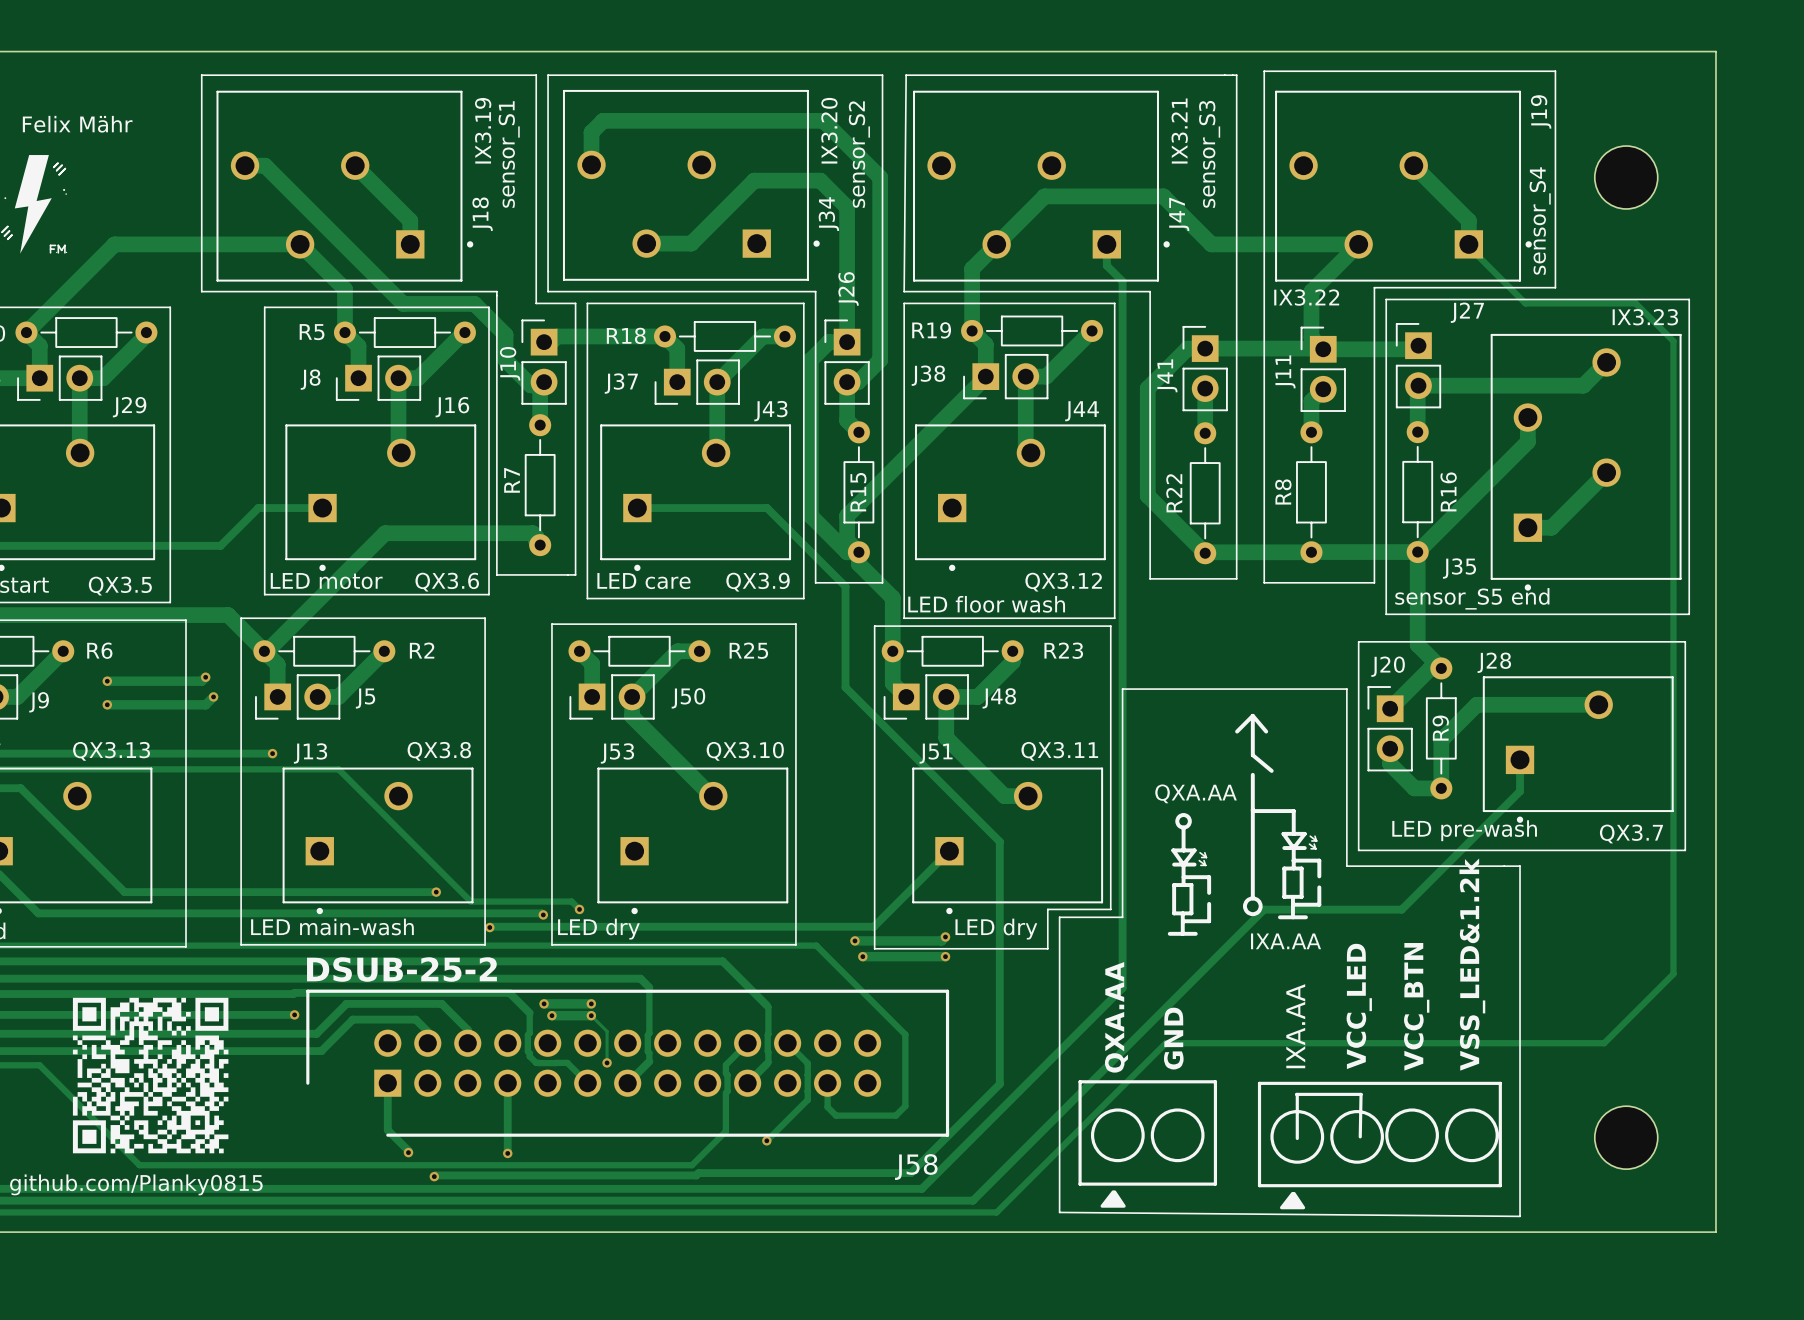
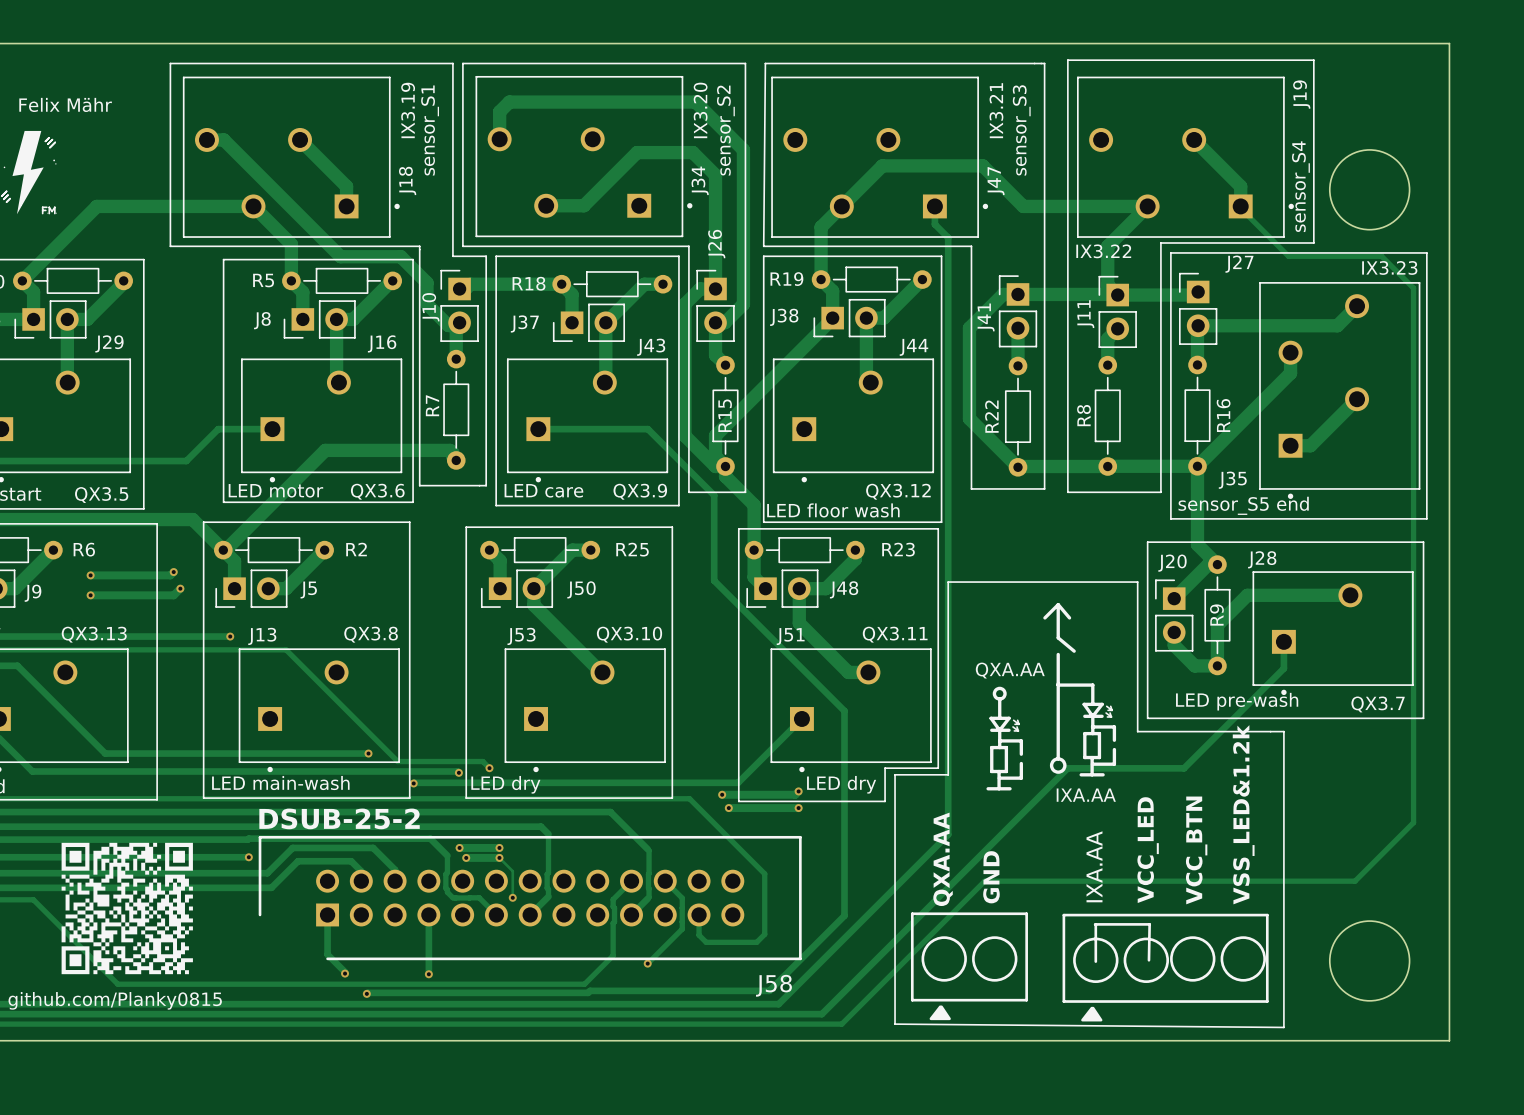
round board edge: none -> [1329, 149, 1411, 231]
part: (1626, 177) -> none
round board edge: none -> [1329, 920, 1411, 1002]
part: (1626, 1137) -> none

